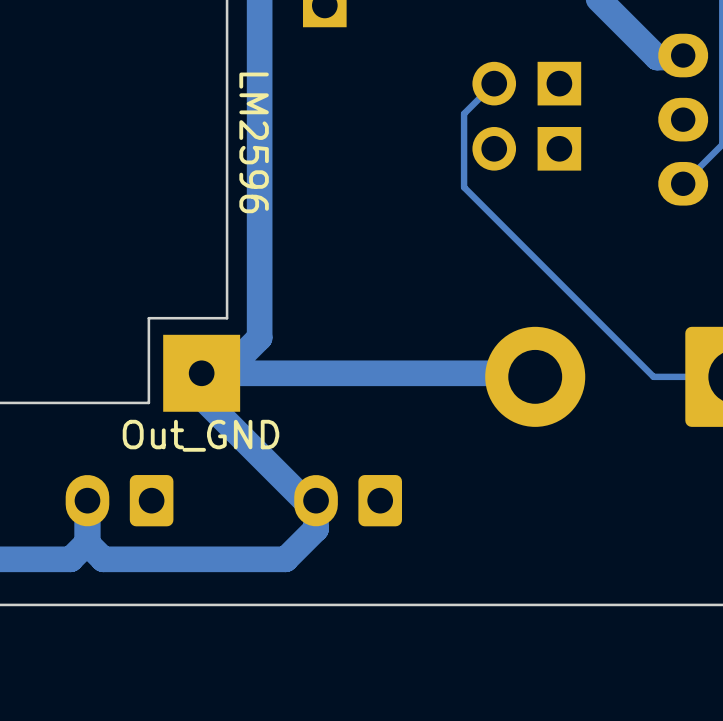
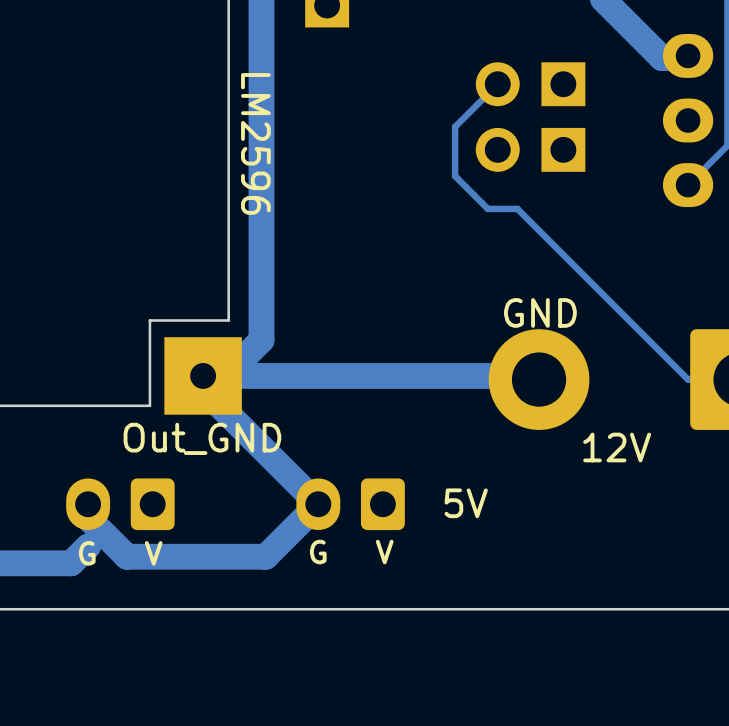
track: (464, 113) (464, 187) (653, 376) (683, 376) -> (467, 114) (455, 126) (455, 176) (487, 208) (517, 208) (688, 379)
text: none -> GND (540, 312)
track: (201, 386) (201, 397) (305, 500) (316, 500) (316, 528) (285, 559) (103, 559) (87, 543) (87, 514) -> (203, 389) (318, 504) (265, 556) (126, 556) (88, 517)
text: none -> 12V (617, 447)
text: none -> 5V (466, 503)
text: none -> G V (351, 552)
text: none -> G V (120, 553)

